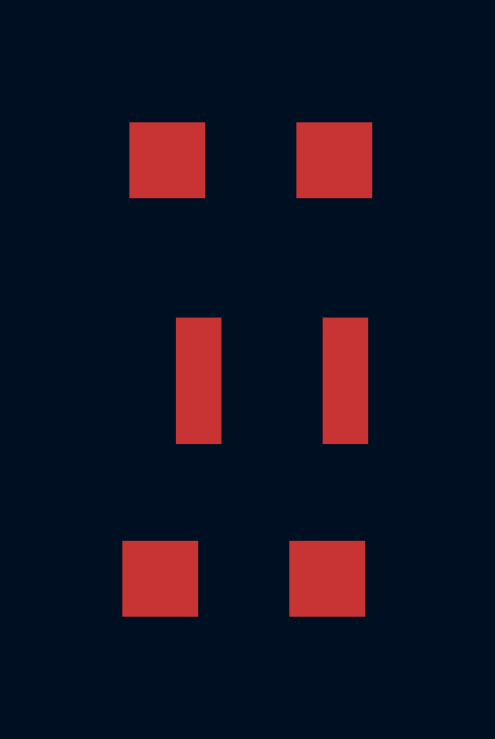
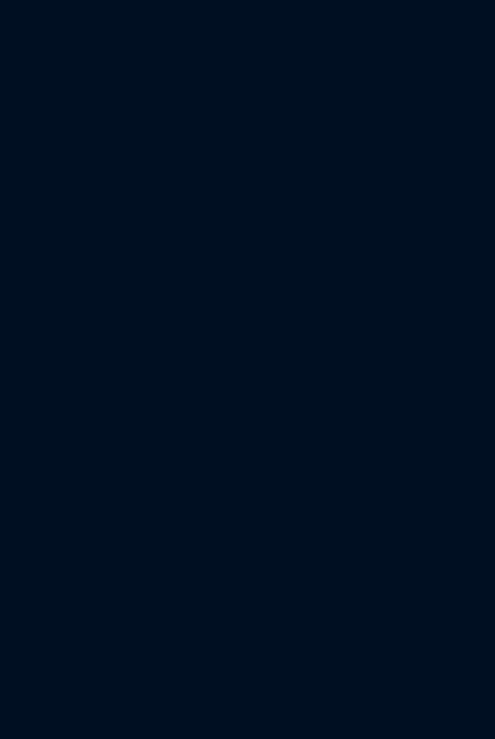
part: (250, 160) -> none
part: (272, 380) -> none
part: (243, 578) -> none

